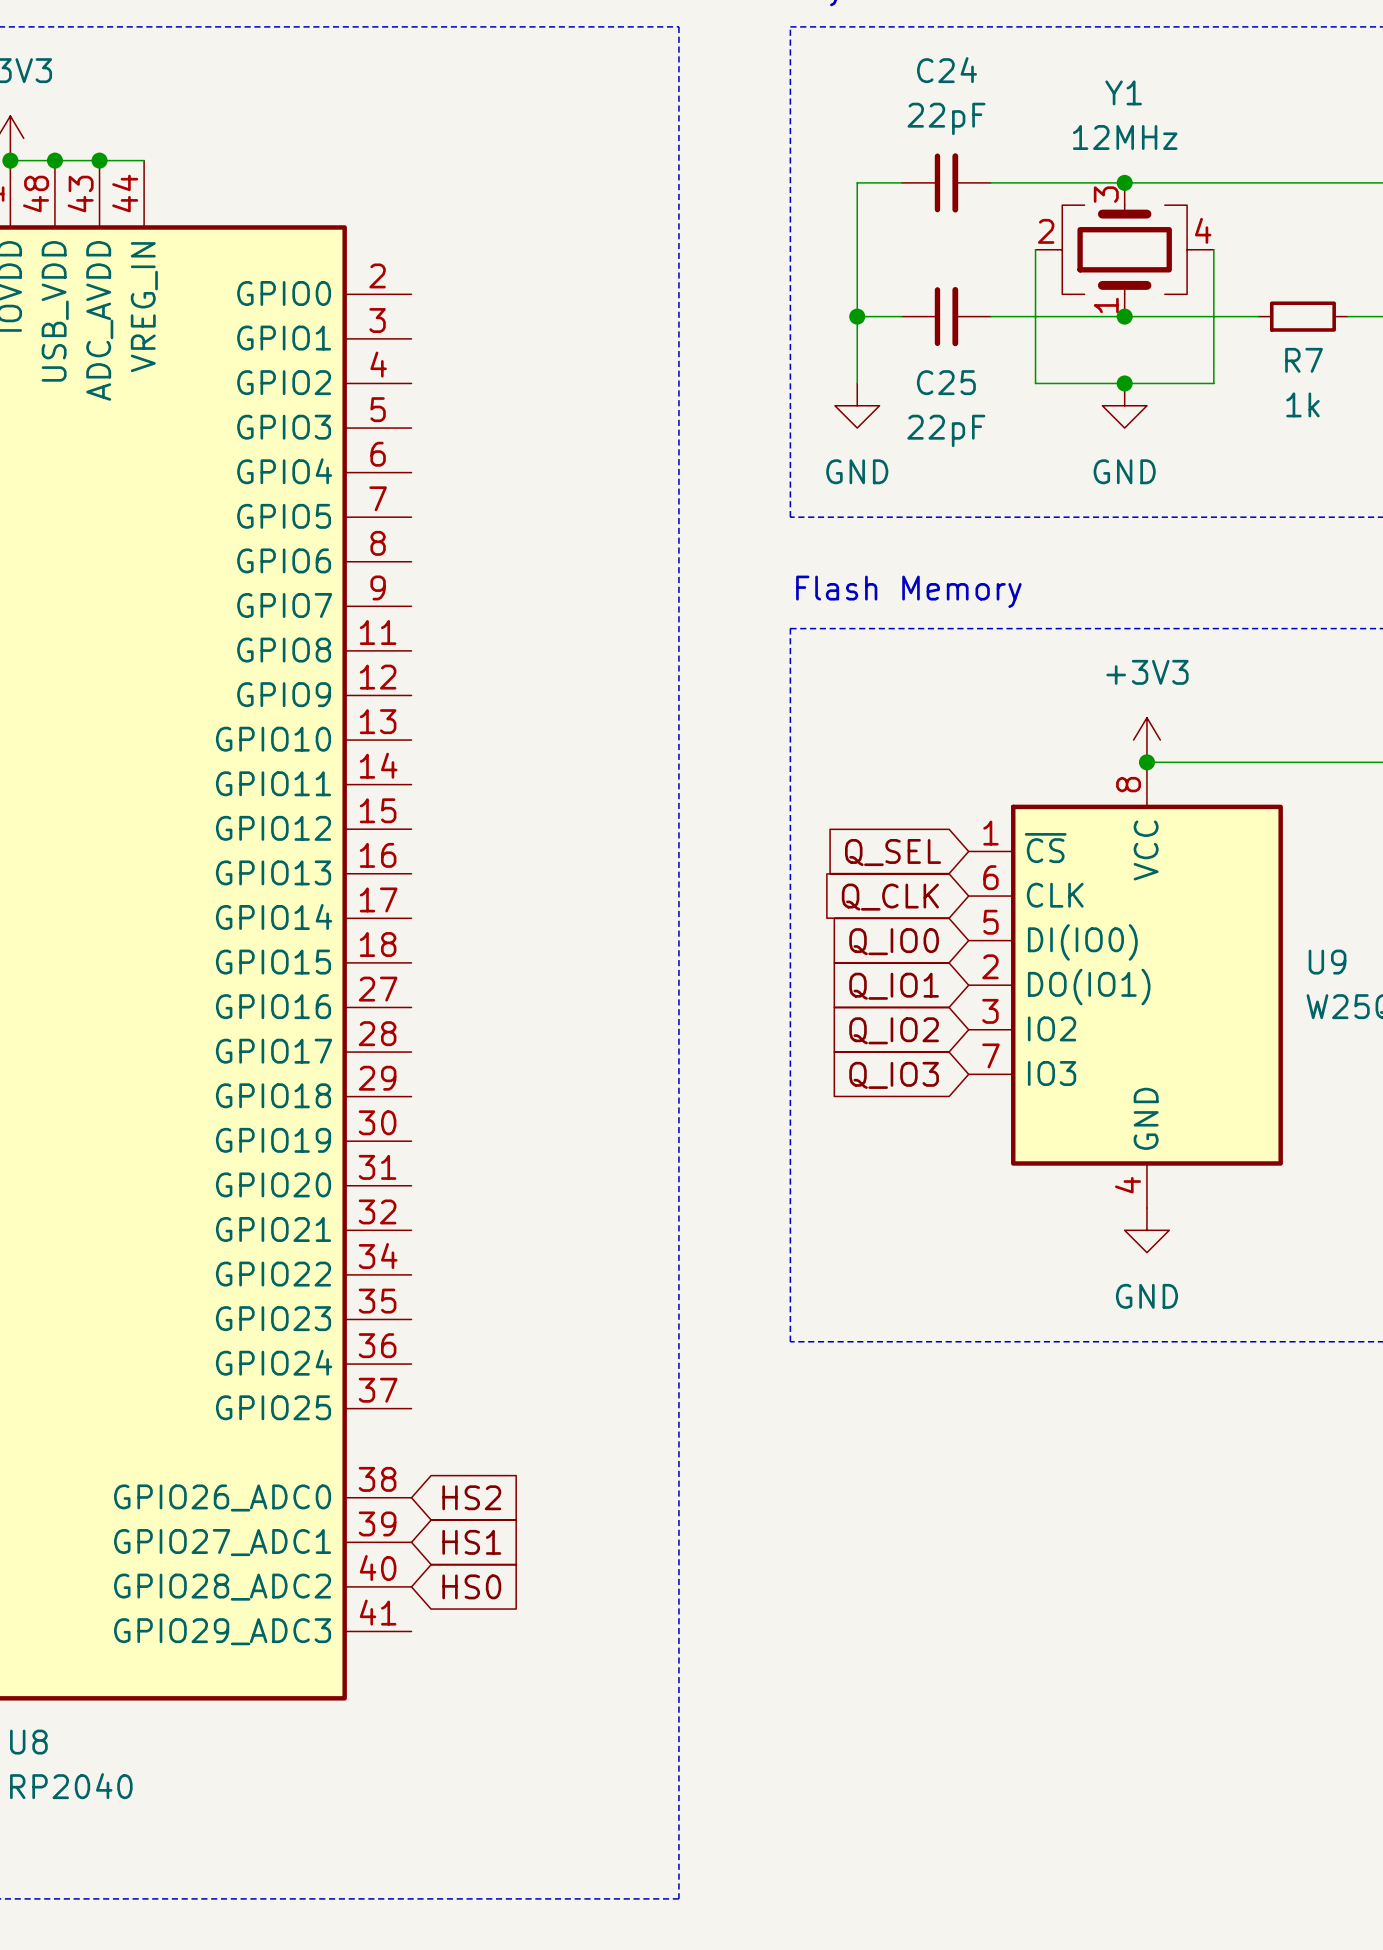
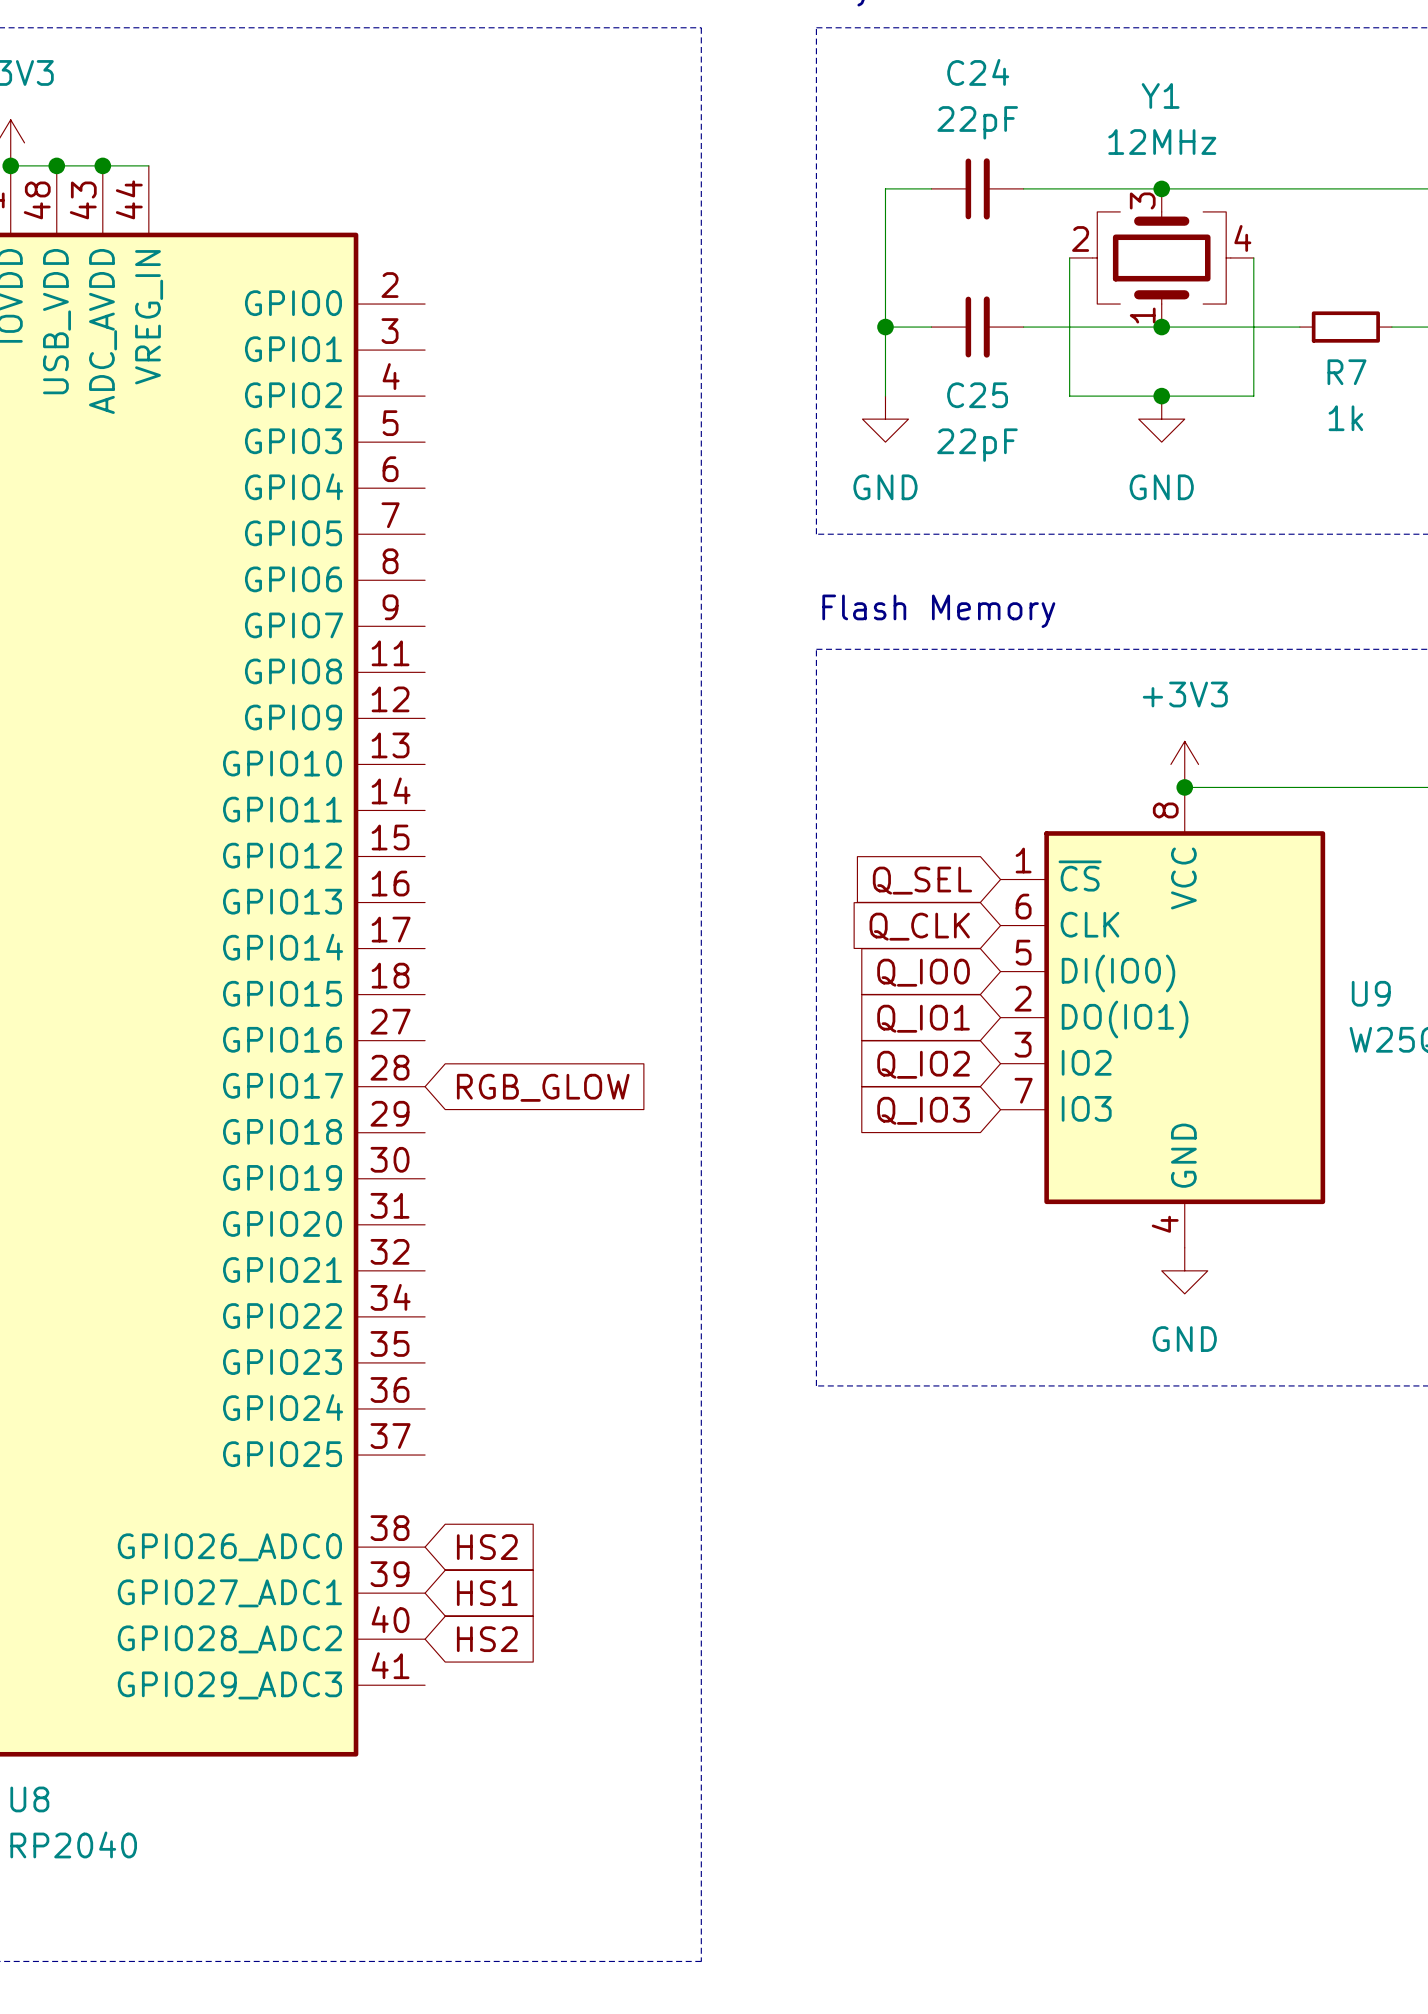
global label: none -> RGB_GLOW (543, 1087)
global label: HS0 (471, 1586) -> HS2 (487, 1639)

